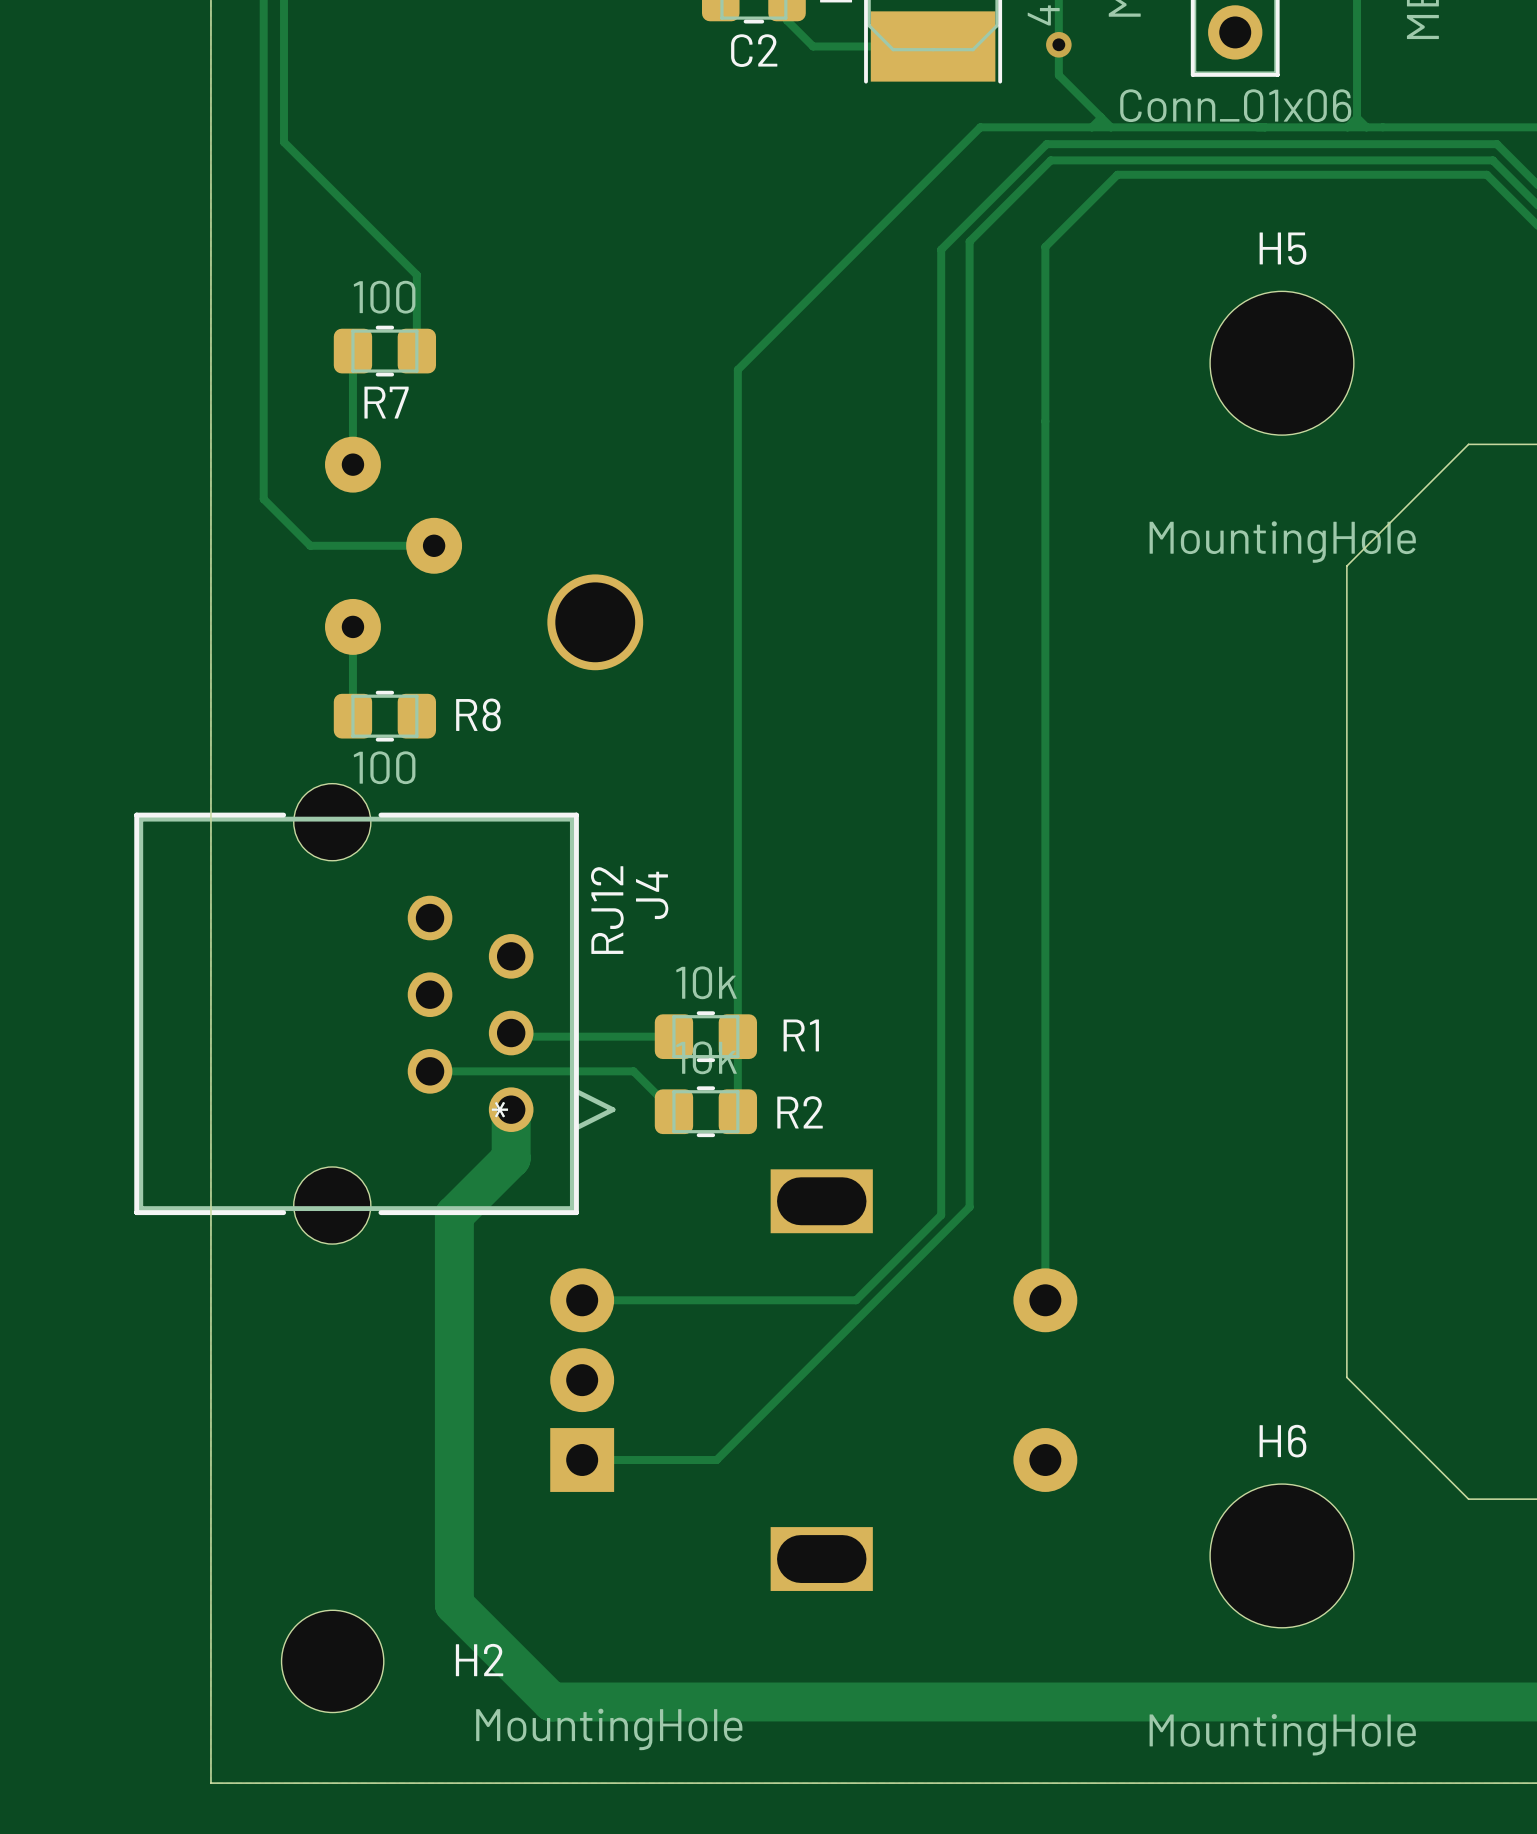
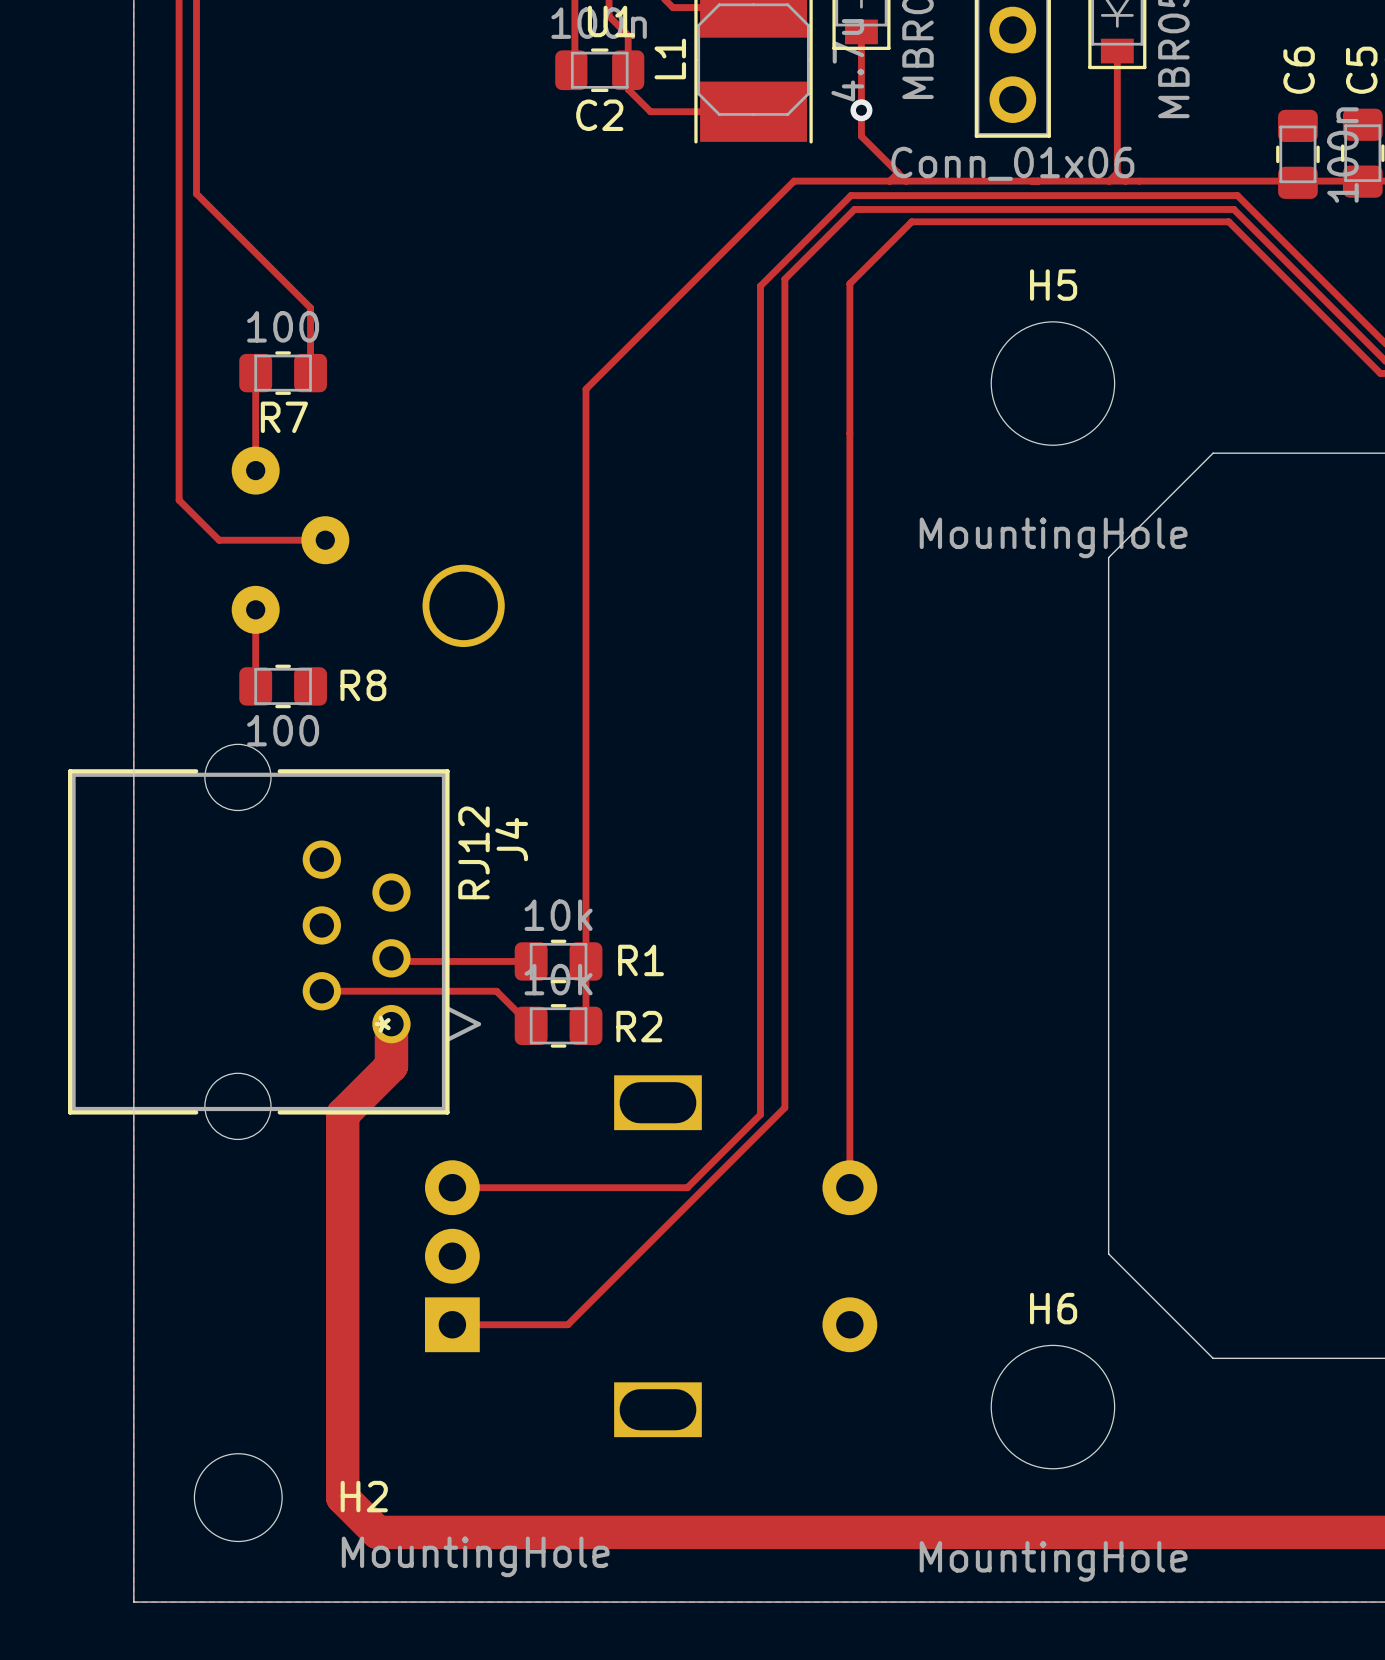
track: (454, 1604) (551, 1701) -> (342, 1448) (342, 1497) (377, 1532) (426, 1532)

